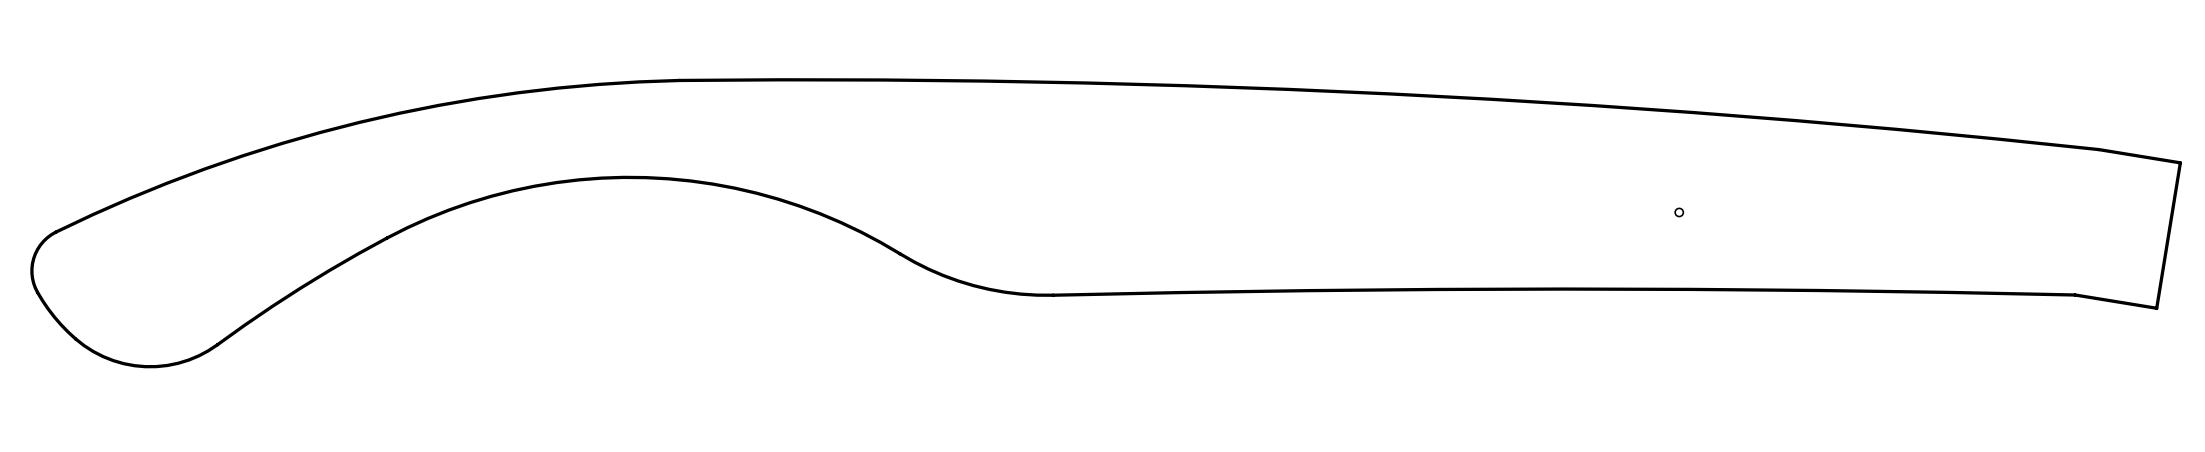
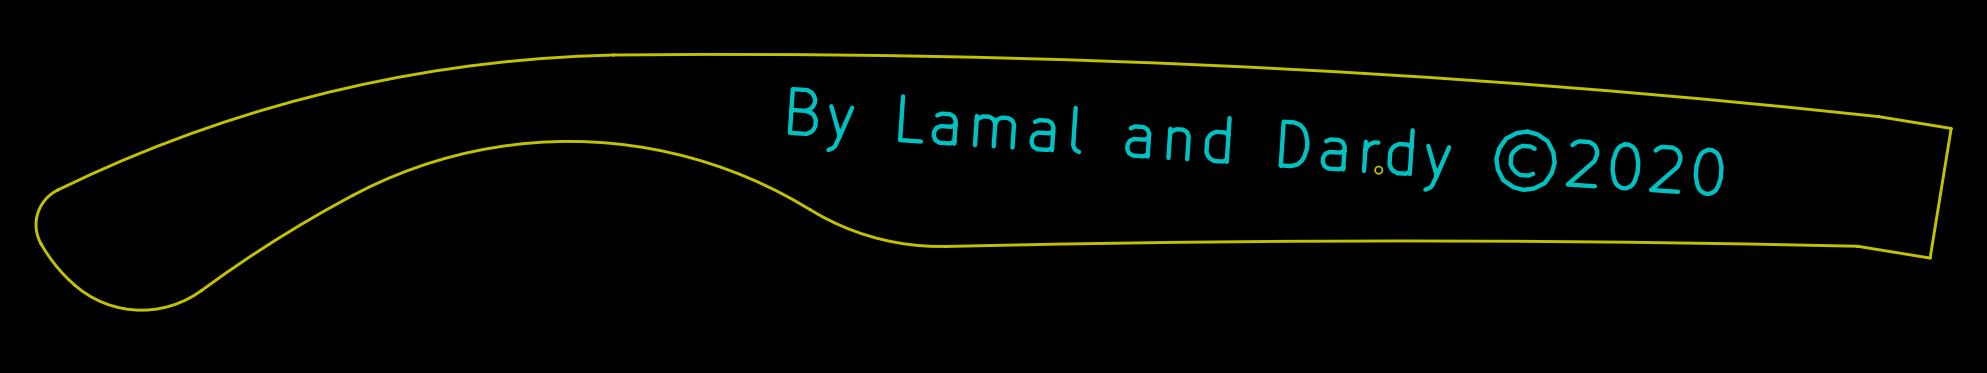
text: none -> By Lamal and Dardy ©2020 (1255, 141)
part position: (1679, 212) -> (1378, 170)

